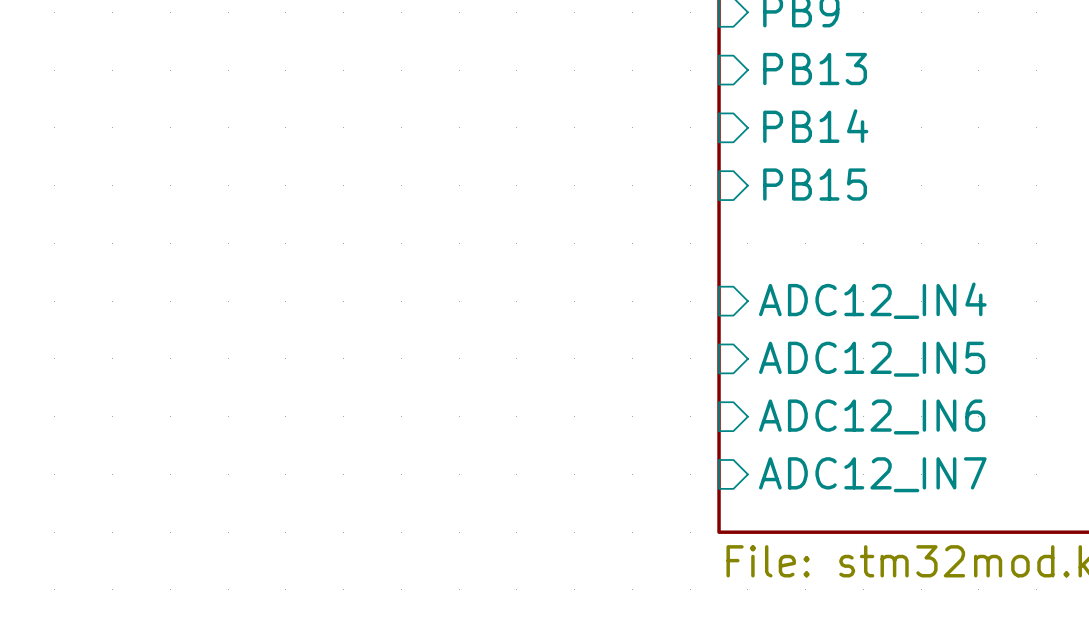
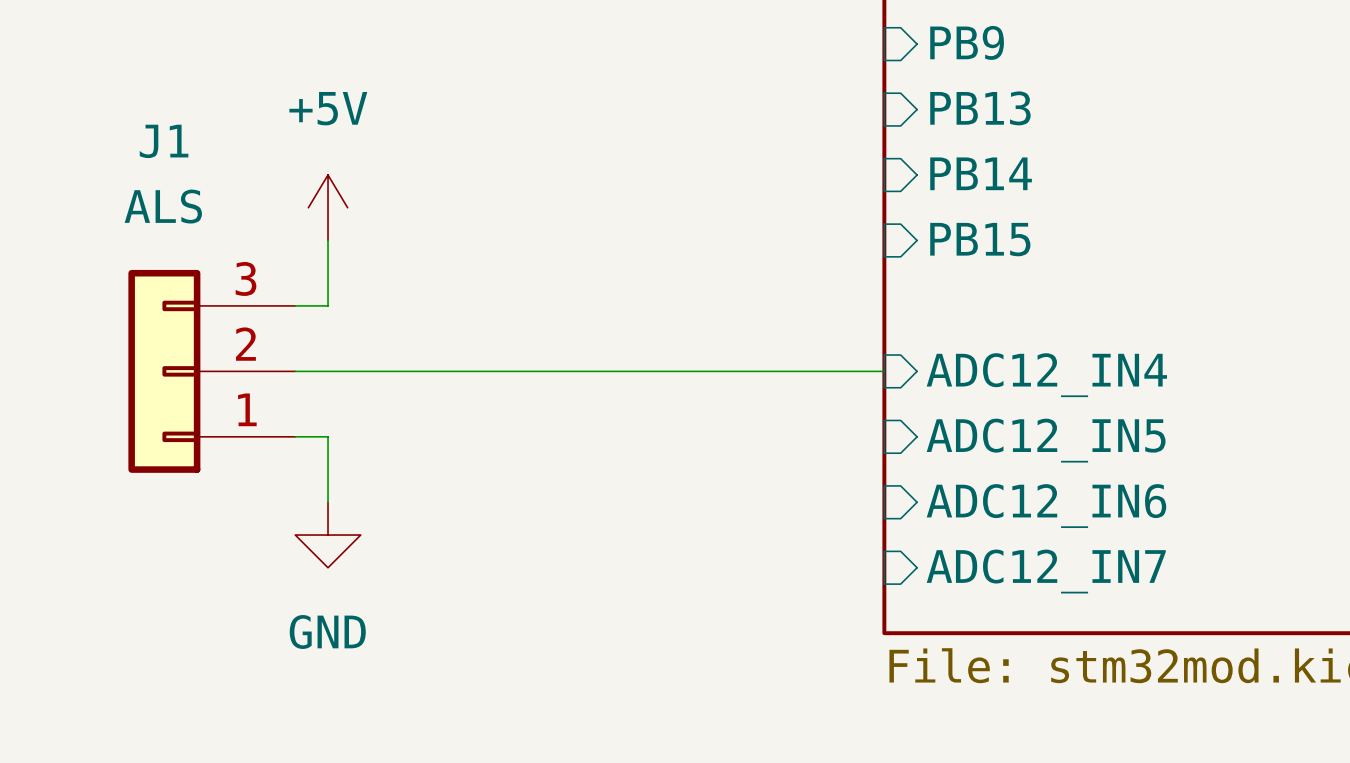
power symbol: none -> +5V (328, 207)
wire: none -> (328, 240) (328, 305) (295, 305)
J1: none -> ALS (211, 371)
wire: none -> (295, 371) (884, 371)
wire: none -> (295, 436) (328, 436) (328, 502)
power symbol: none -> GND (328, 535)

